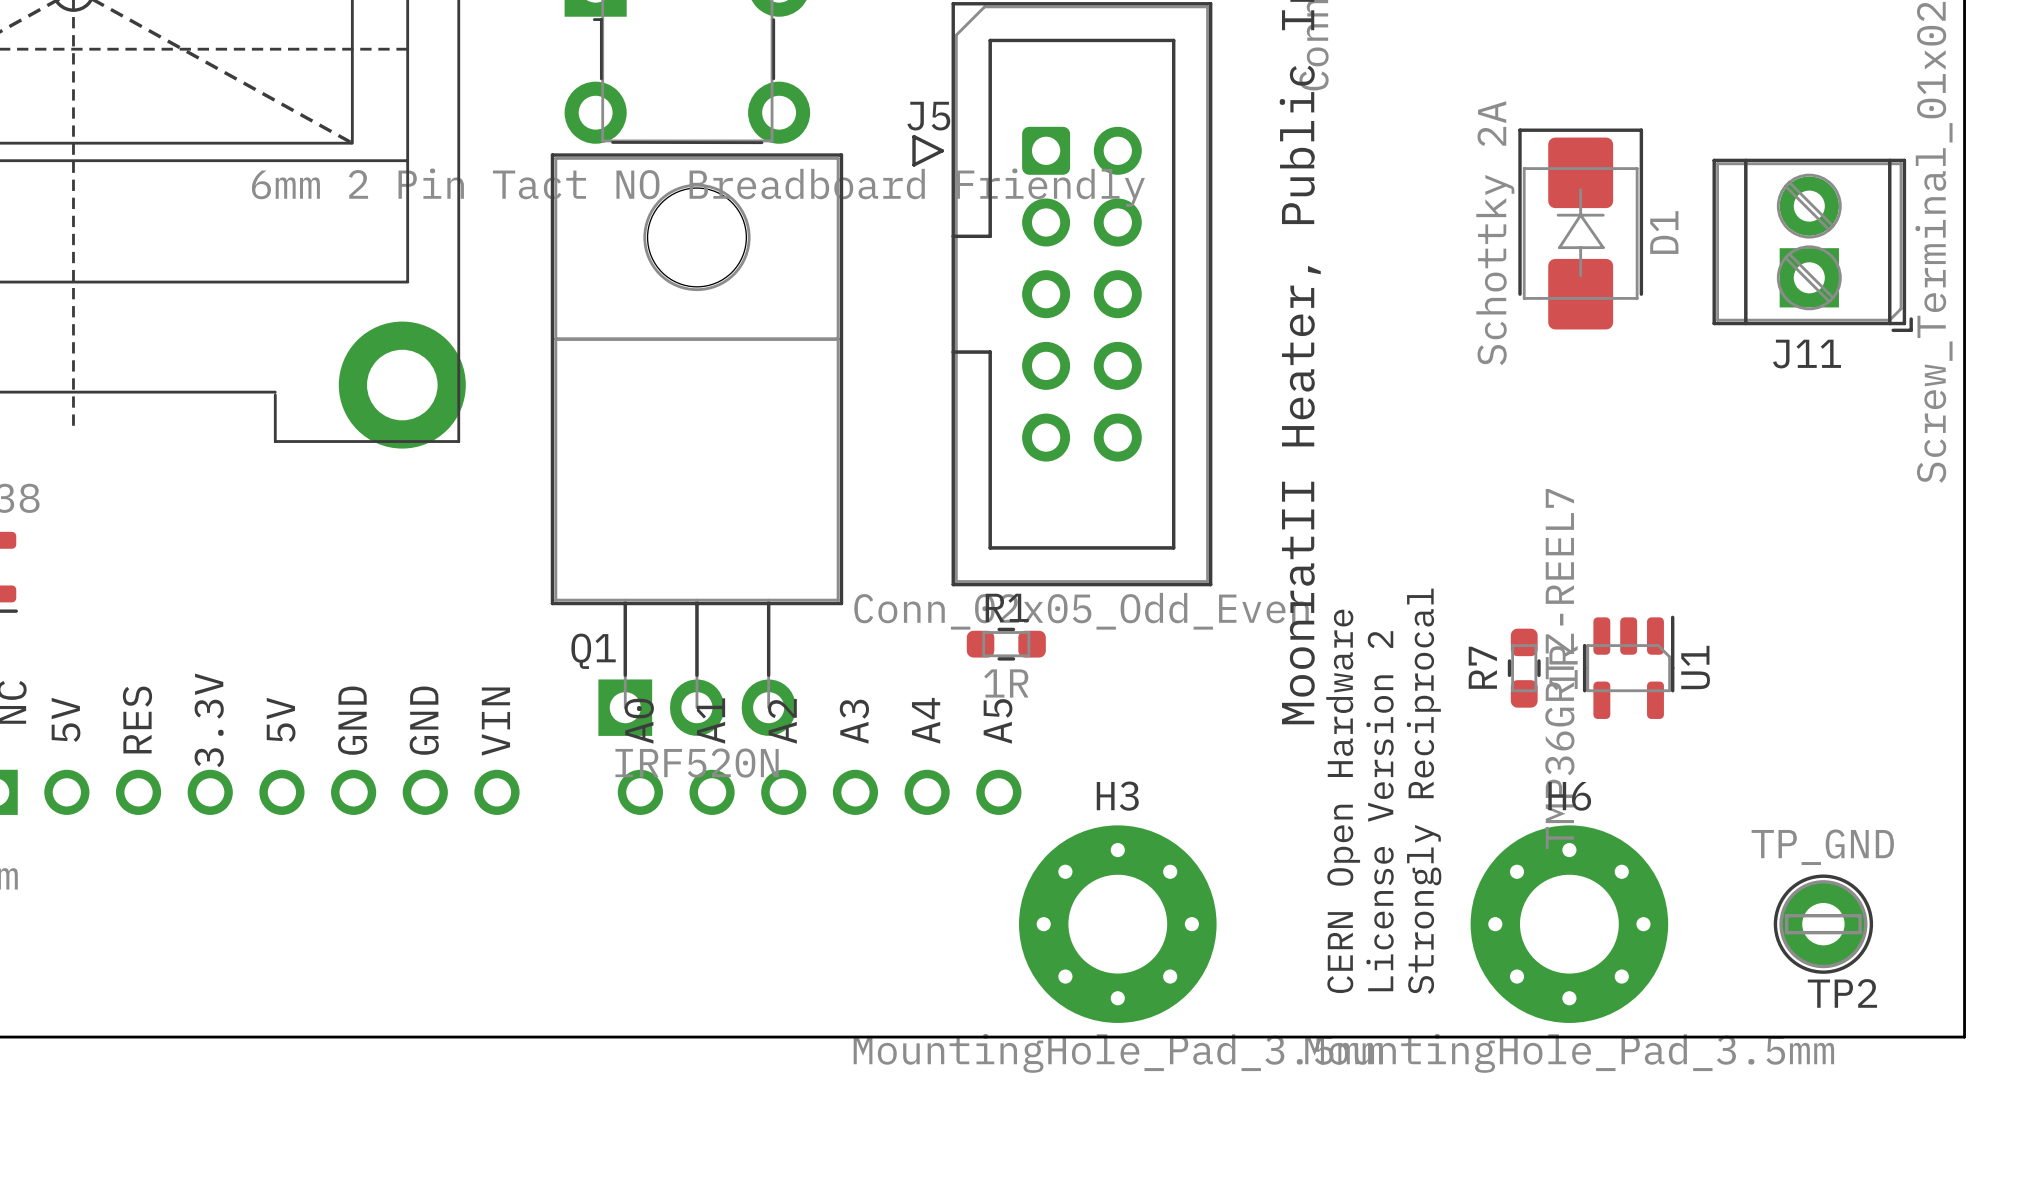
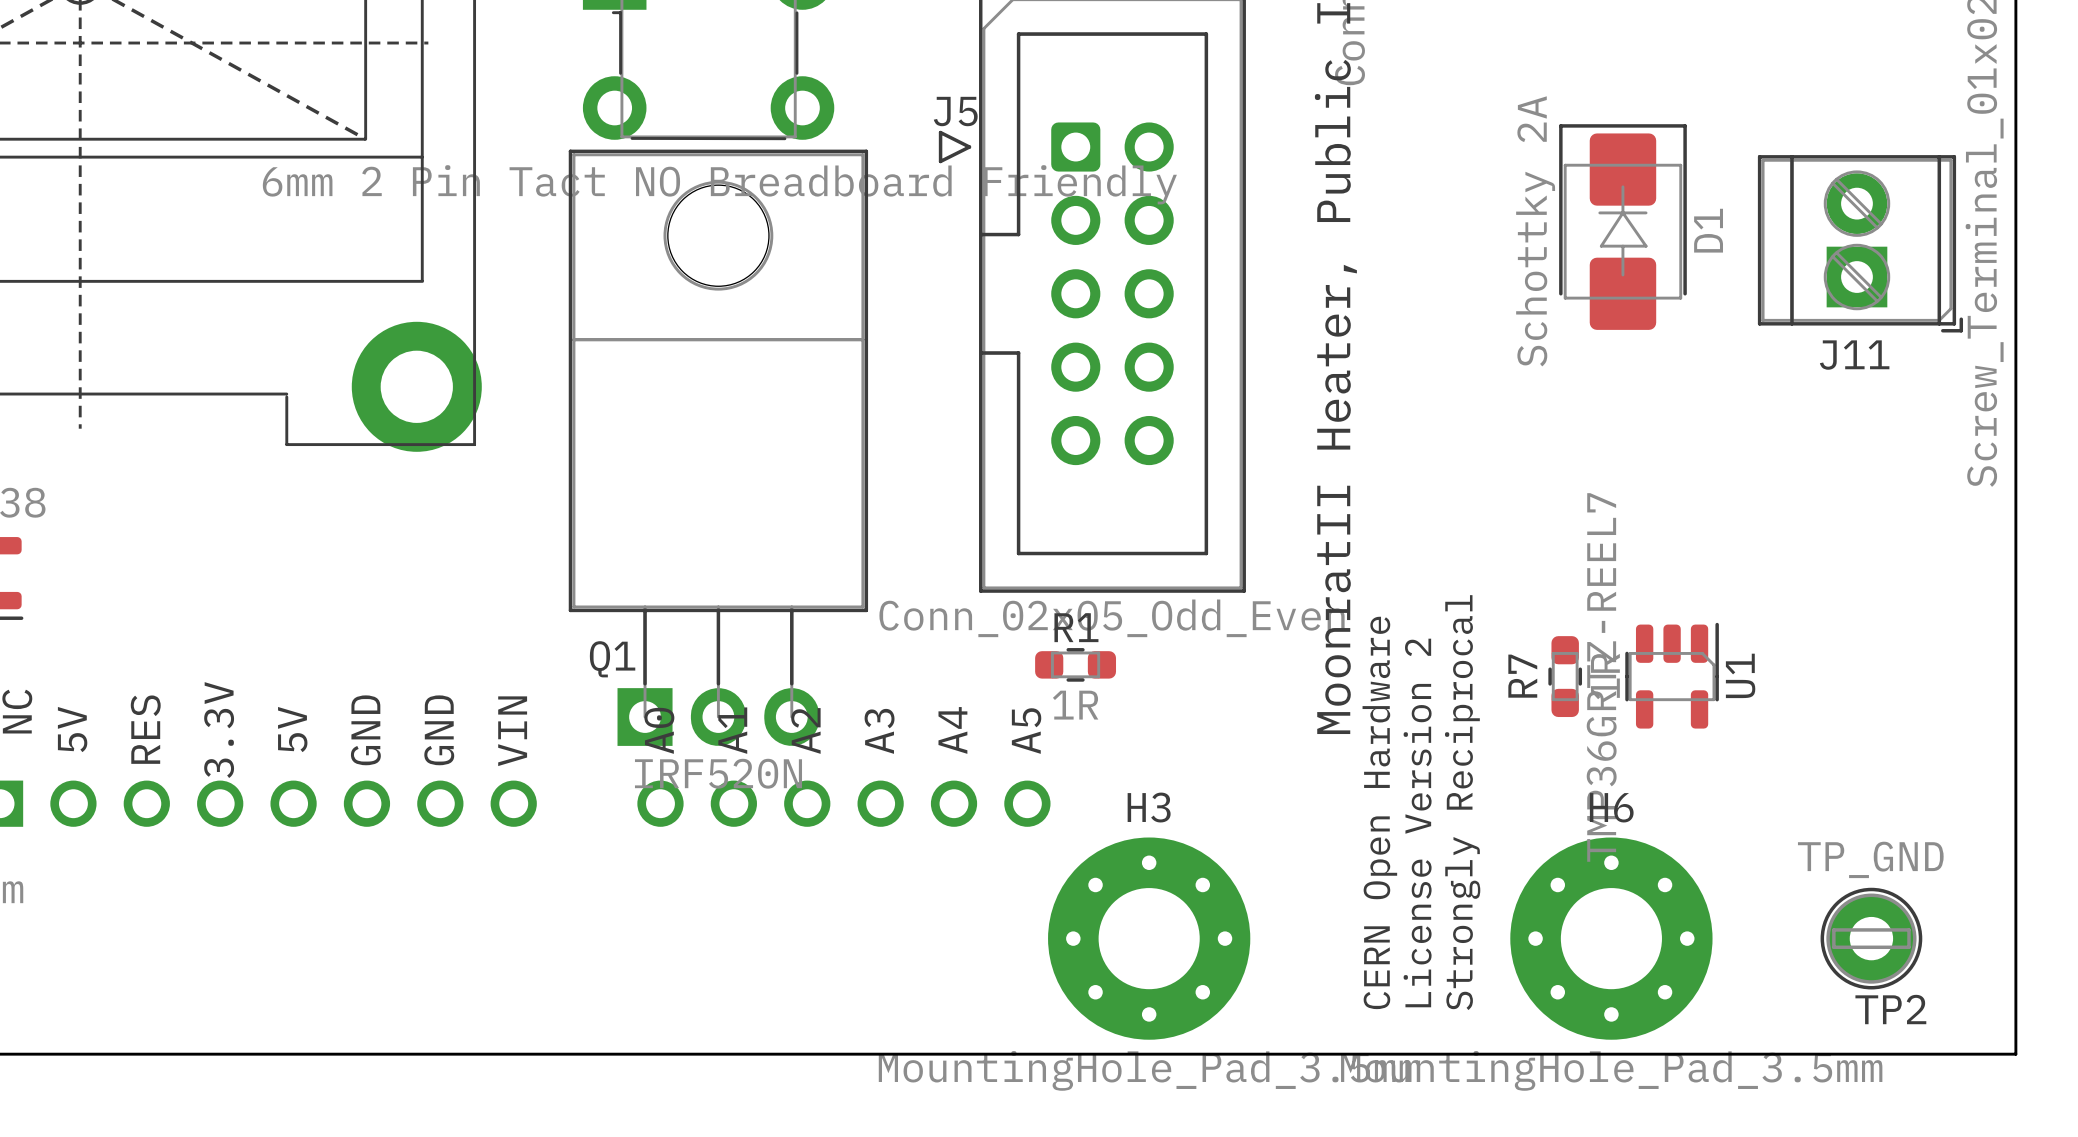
R1 position: (1006, 644) -> (1075, 664)

